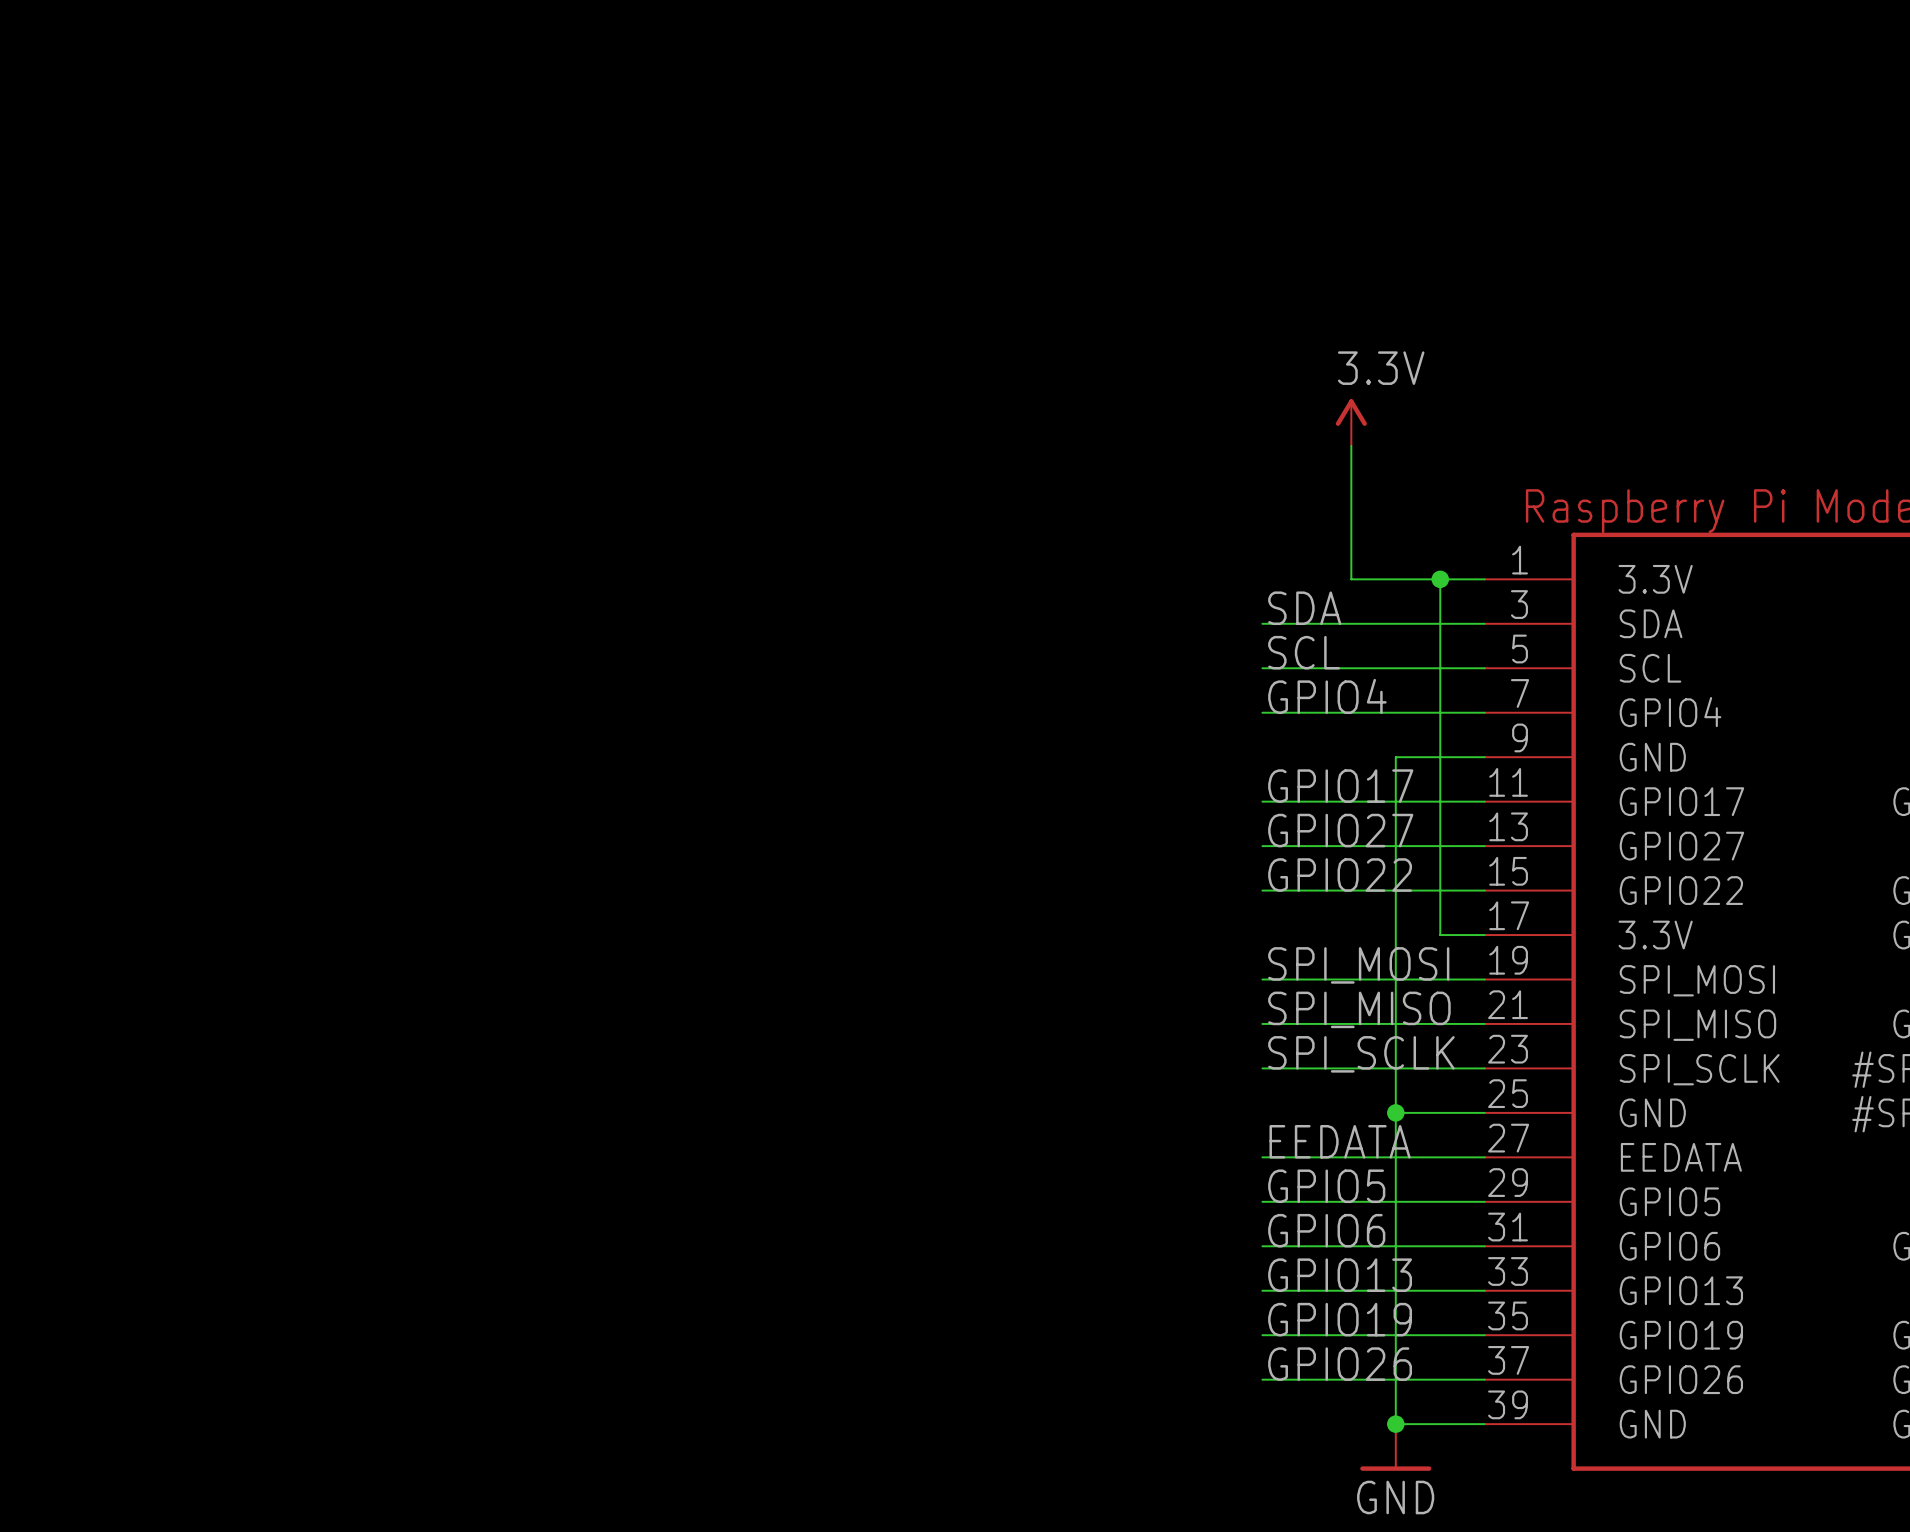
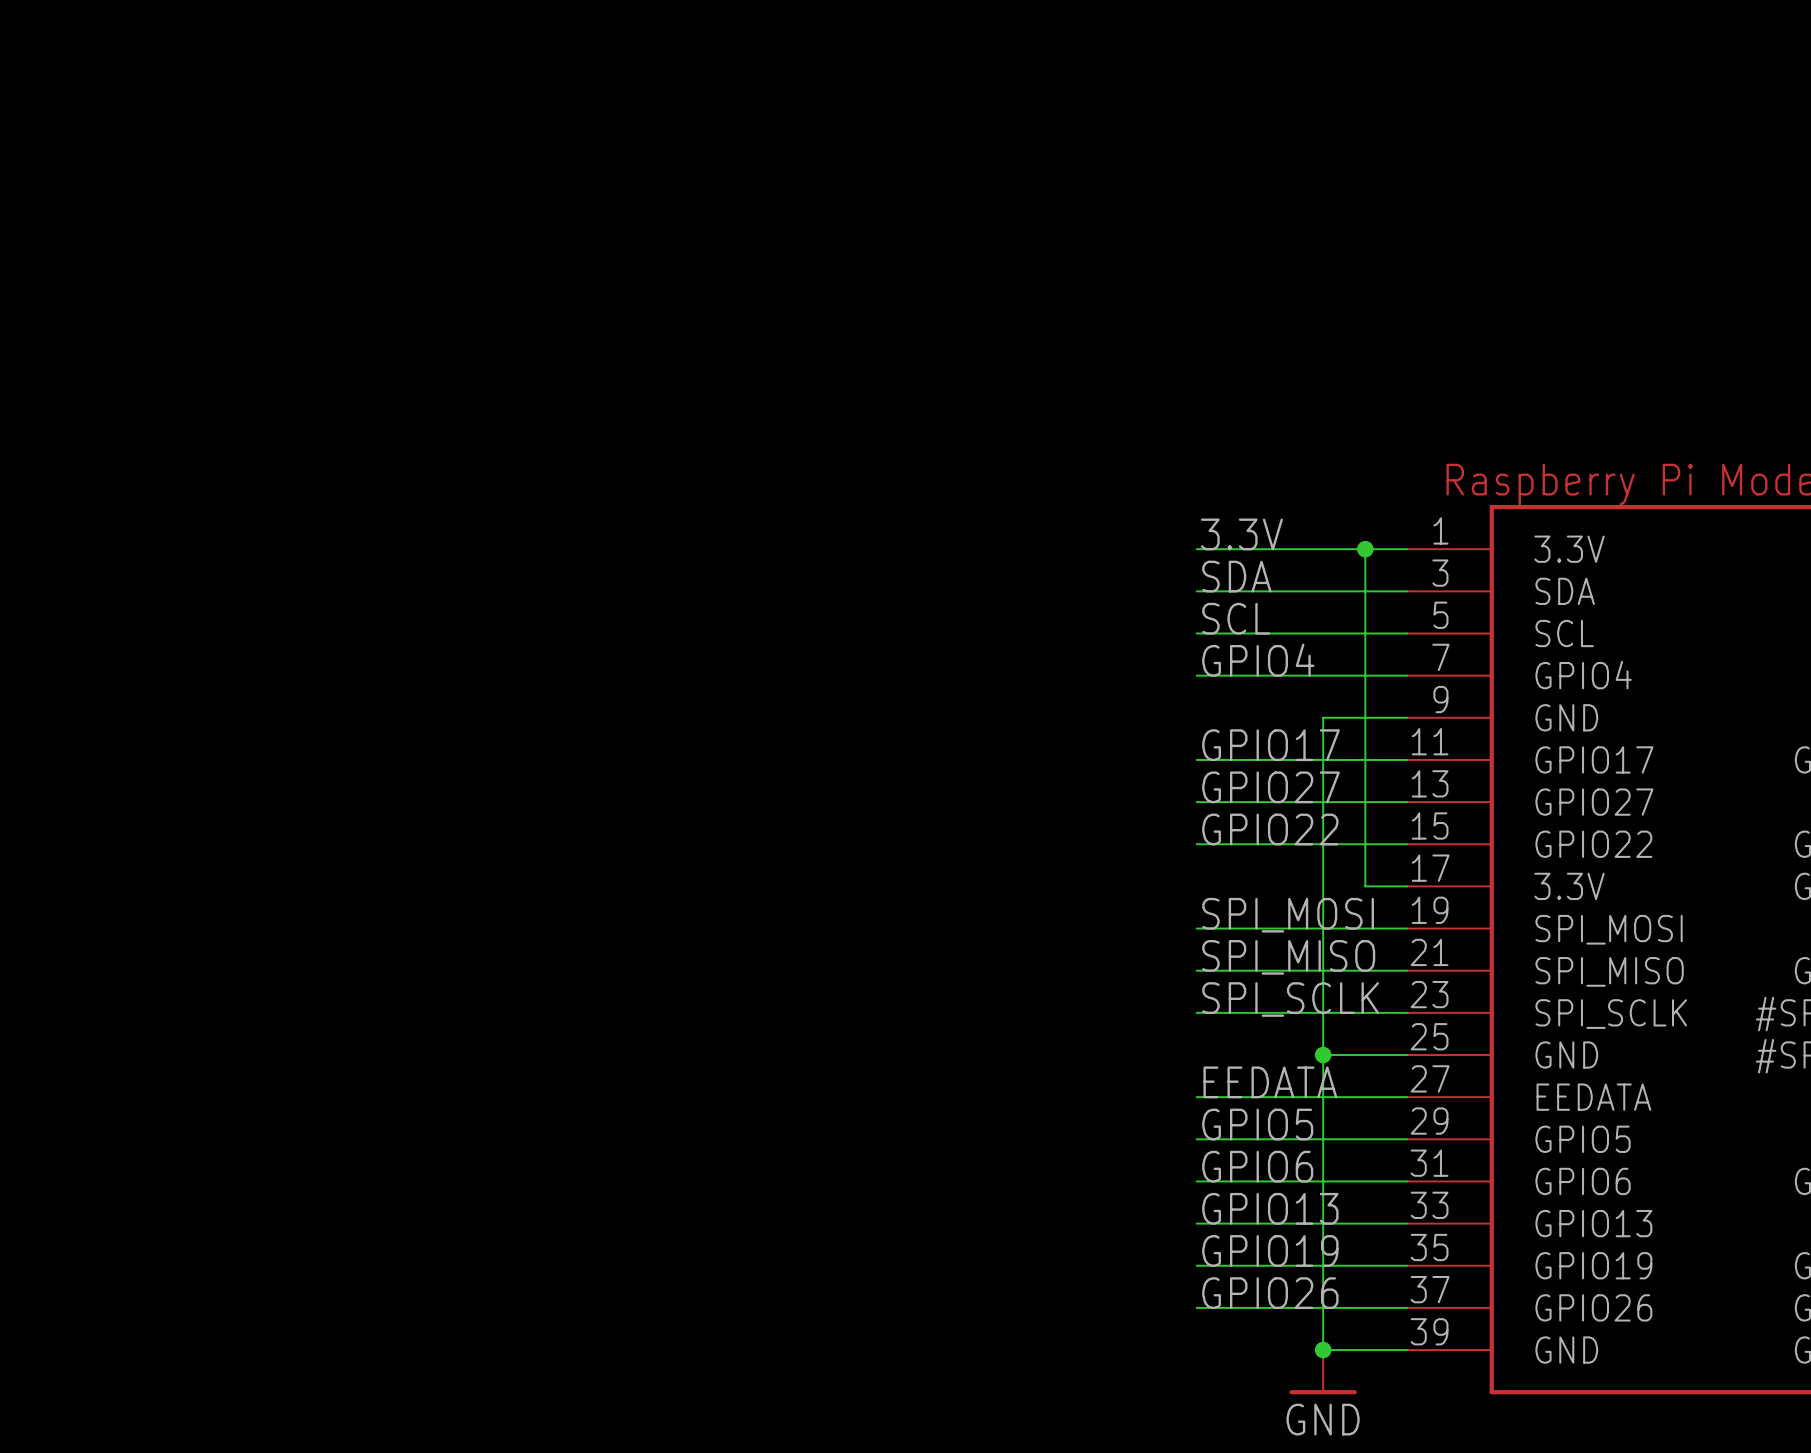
power symbol: 3.3V (1351, 422) -> none
wire: (1351, 445) (1351, 579) -> (1196, 549) (1281, 549)
label: none -> 3.3V (1241, 534)

